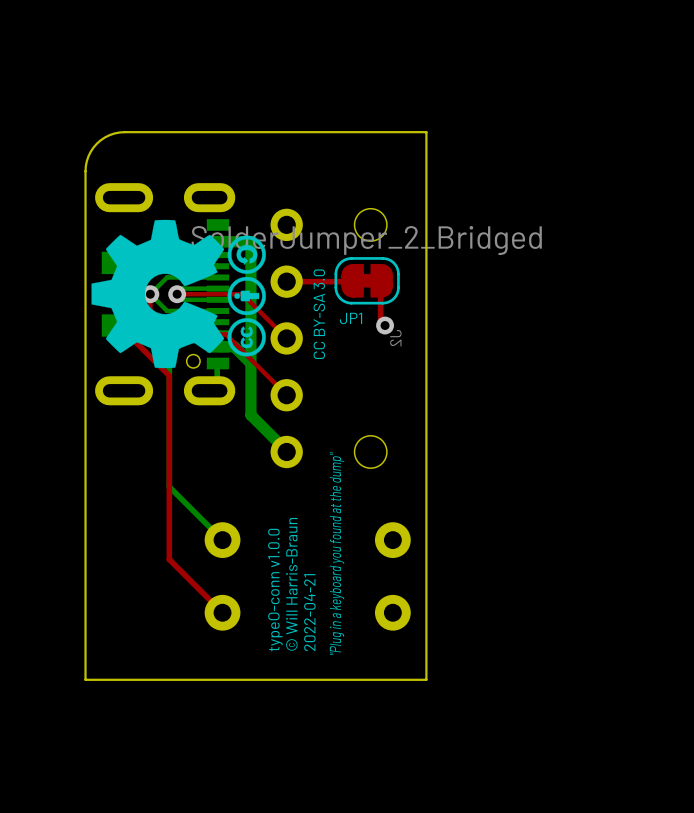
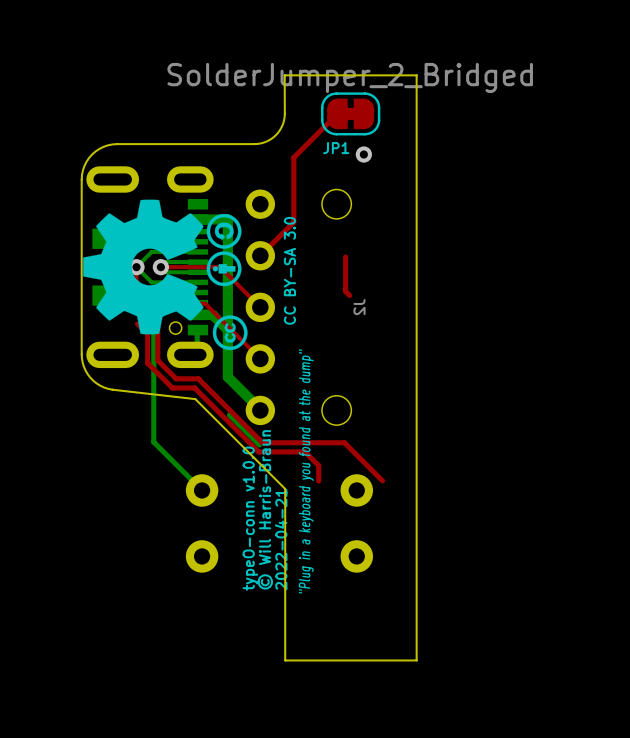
board edge: (124, 132) (426, 132) (426, 679) (85, 679) (85, 166) (90, 151) (100, 140) (114, 133) (124, 132) -> (284, 75) (284, 120) (278, 132) (267, 141) (254, 144) (112, 144) (99, 148) (89, 158) (84, 166) (81, 179) (82, 362) (85, 370) (93, 380) (108, 388) (195, 399) (285, 488) (285, 660) (416, 660) (416, 75) (284, 75)
via: none -> (363, 154)
JP1 position: (367, 280) -> (350, 113)
top track: (286, 281) (346, 281) -> (260, 255) (293, 222) (293, 157) (337, 113)
top track: (134, 314) (134, 340) (169, 375) (169, 559) (222, 612) -> (121, 285) (157, 321) (157, 360) (176, 378) (198, 378) (262, 442) (344, 442) (382, 480)
via: (385, 325) -> none
drawing: [240, 326, 253, 349] -> none
drawing position: (246, 337) -> (230, 332)
drawing: none -> [224, 322, 236, 343]
top track: none -> (137, 324) (147, 334) (147, 363) (172, 387) (194, 387) (258, 451) (305, 451) (318, 465) (318, 481)
bottom track: none -> (229, 415) (259, 445)

